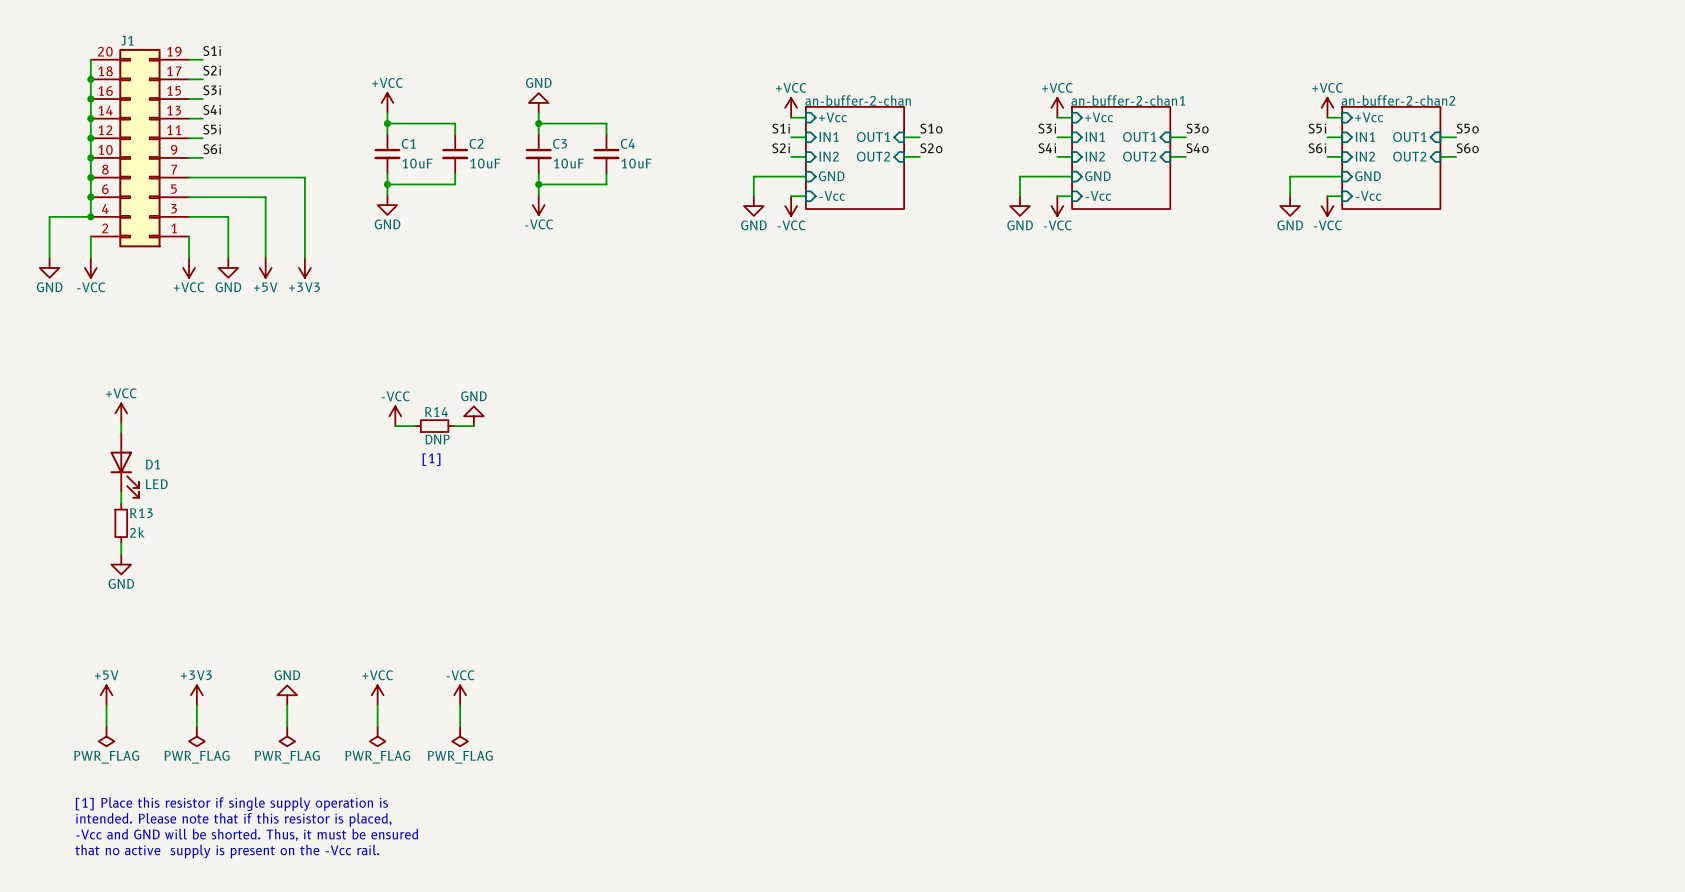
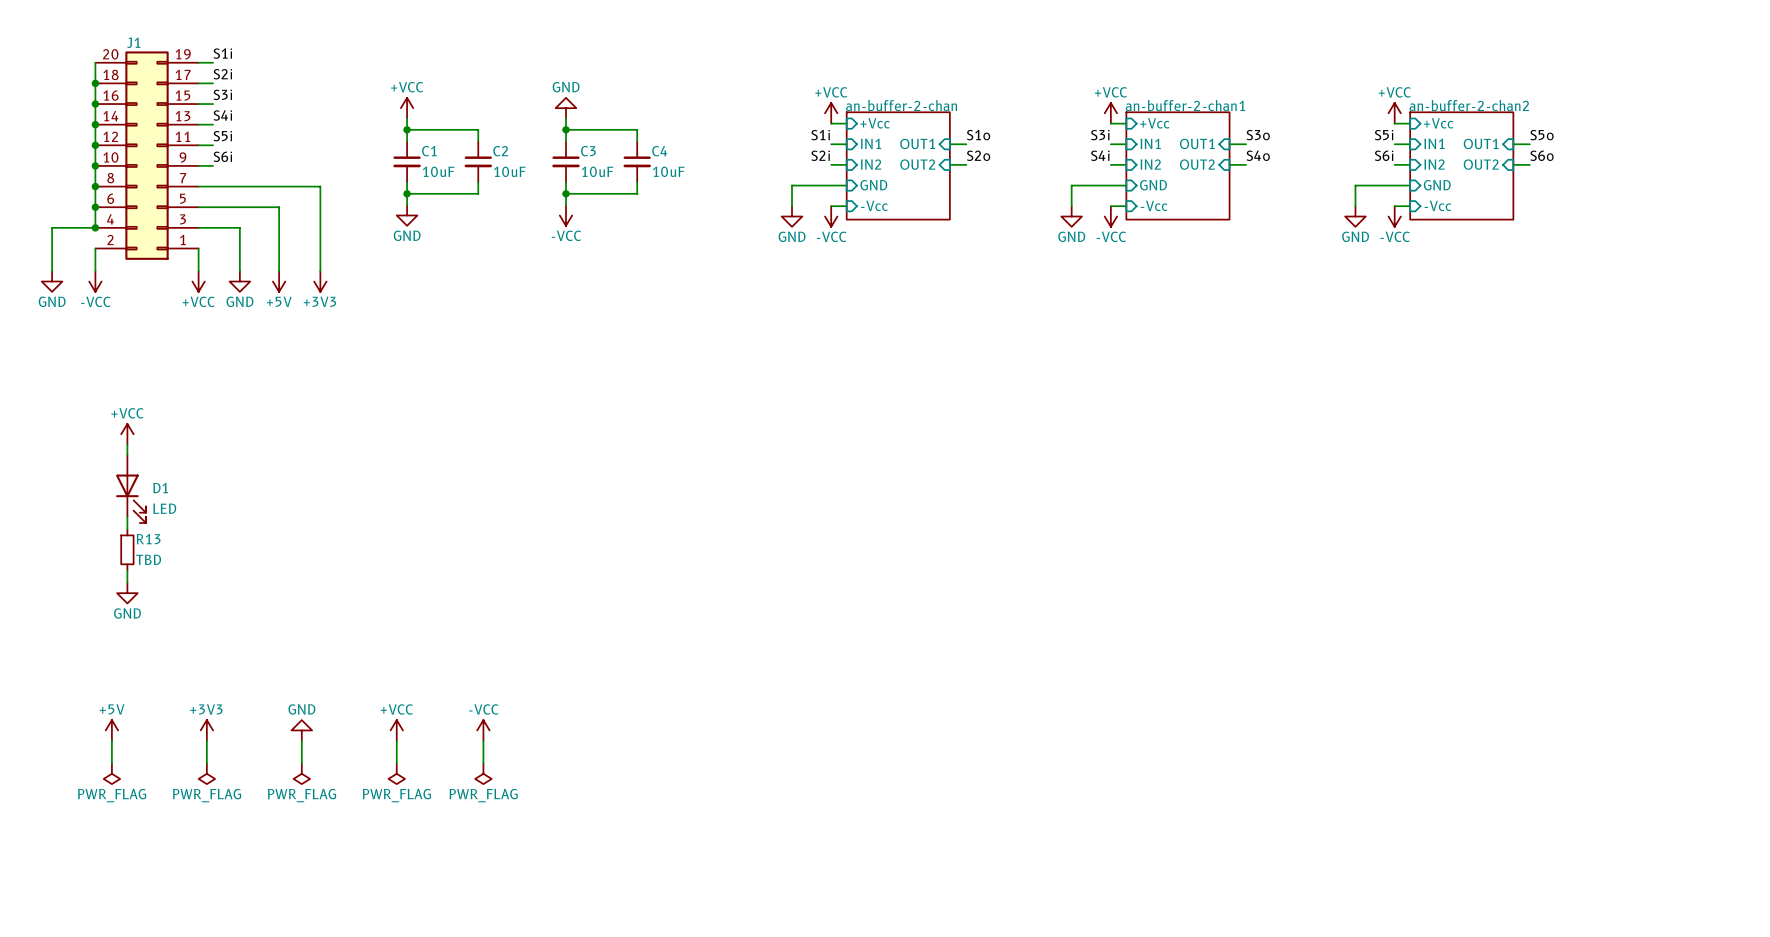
power symbol: -VCC (395, 416) -> none
power symbol: GND (473, 416) -> none
wire: (395, 426) (414, 426) -> none
R14: DNP (434, 426) -> none
wire: (454, 426) (473, 426) -> none
text: [1] (431, 459) -> none
R13 value: 2k (137, 532) -> TBD (148, 559)
text: [1] Place this resistor if single supply operation is (231, 804) -> none
text: intended. Please note that if this resistor is placed, (233, 819) -> none
text: -Vcc and GND will be shorted. Thus, it must be ensured (247, 835) -> none
text: that no active supply is present on the -Vcc rail. (227, 851) -> none

